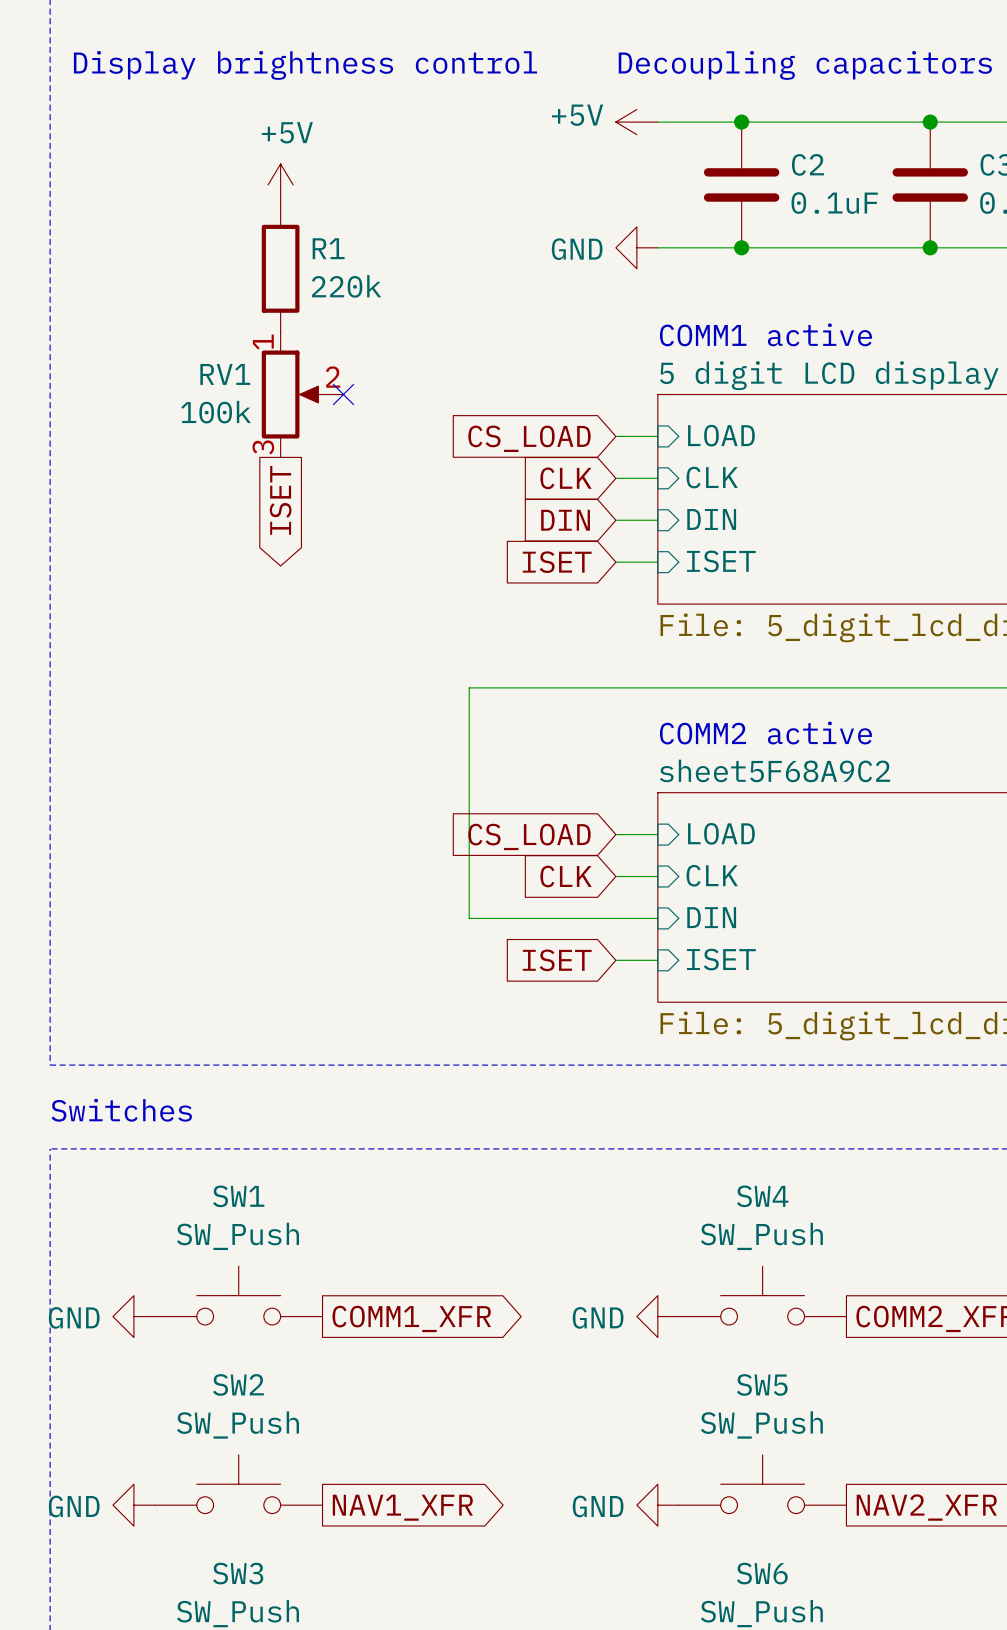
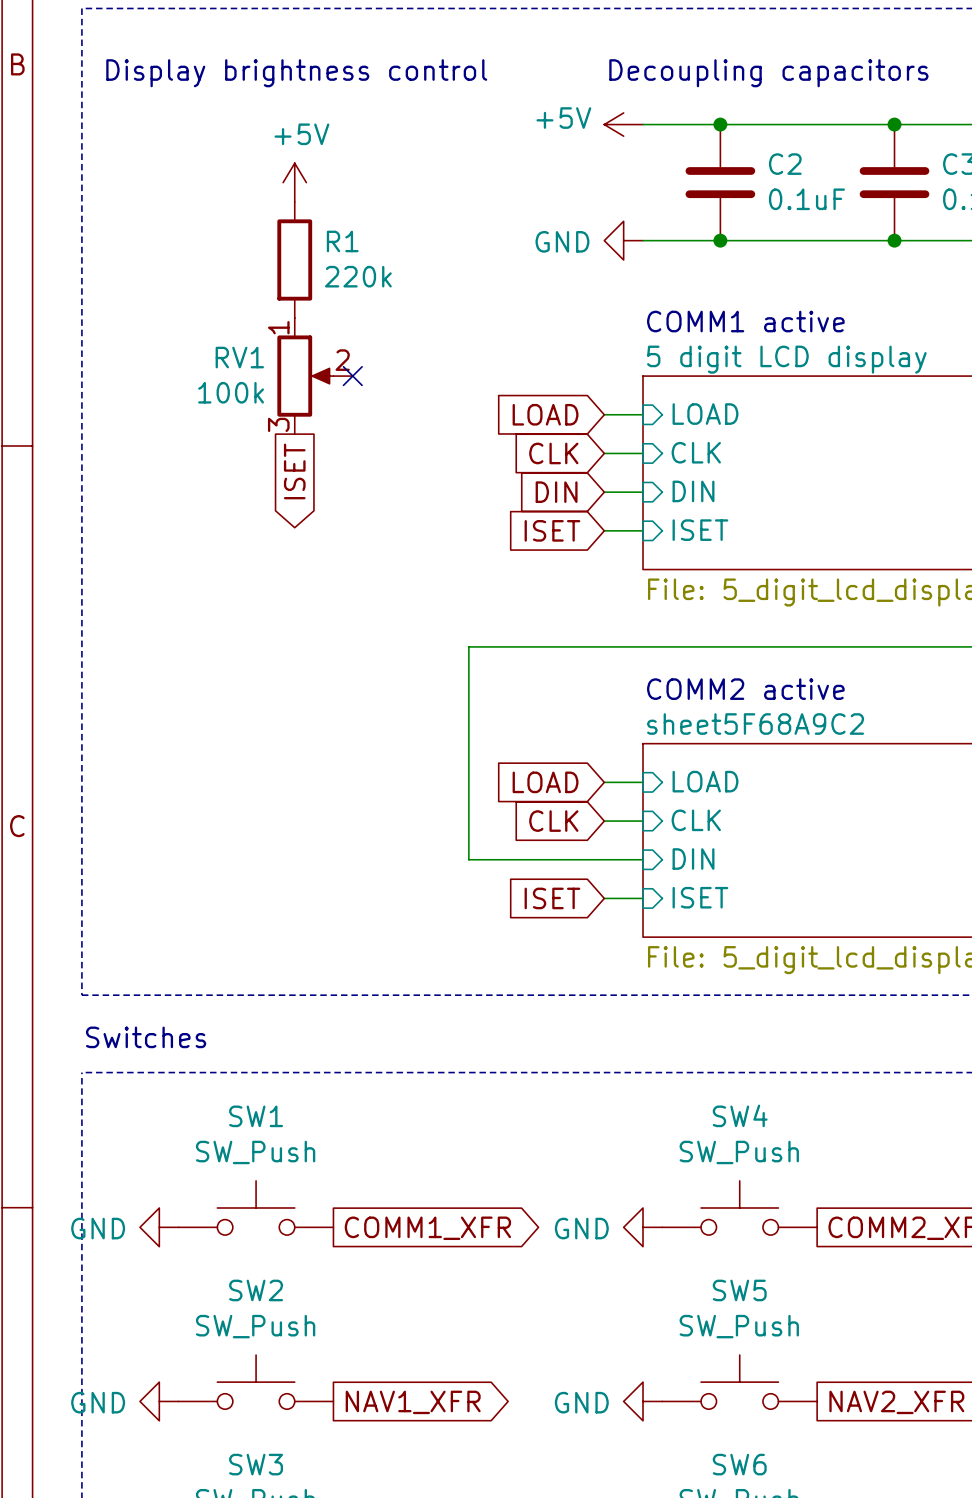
global label: CS_LOAD (529, 438) -> LOAD (545, 414)
global label: CS_LOAD (529, 836) -> LOAD (545, 782)

